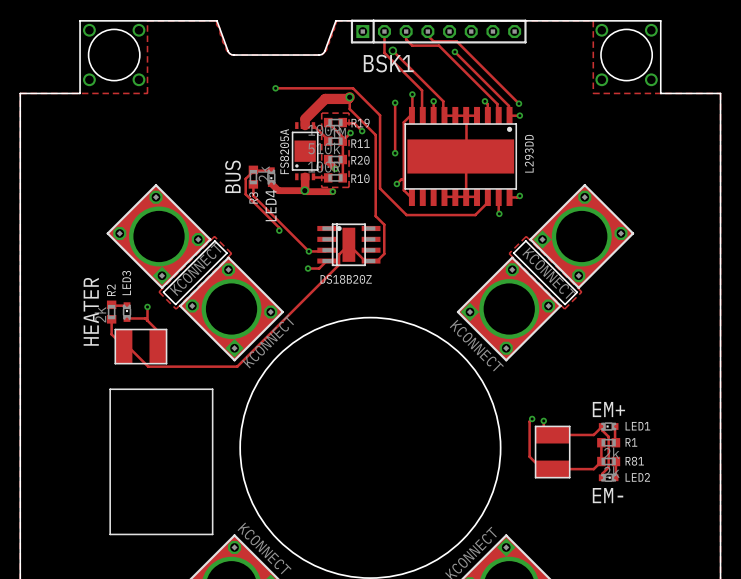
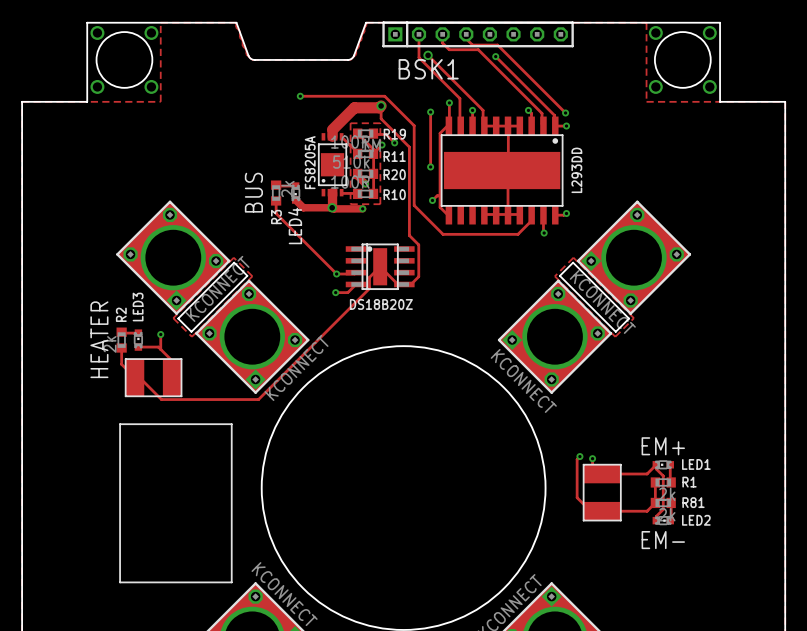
track: (253, 169) (245, 178) (245, 194) (279, 227) (279, 230) -> none
via: (279, 230) -> none

